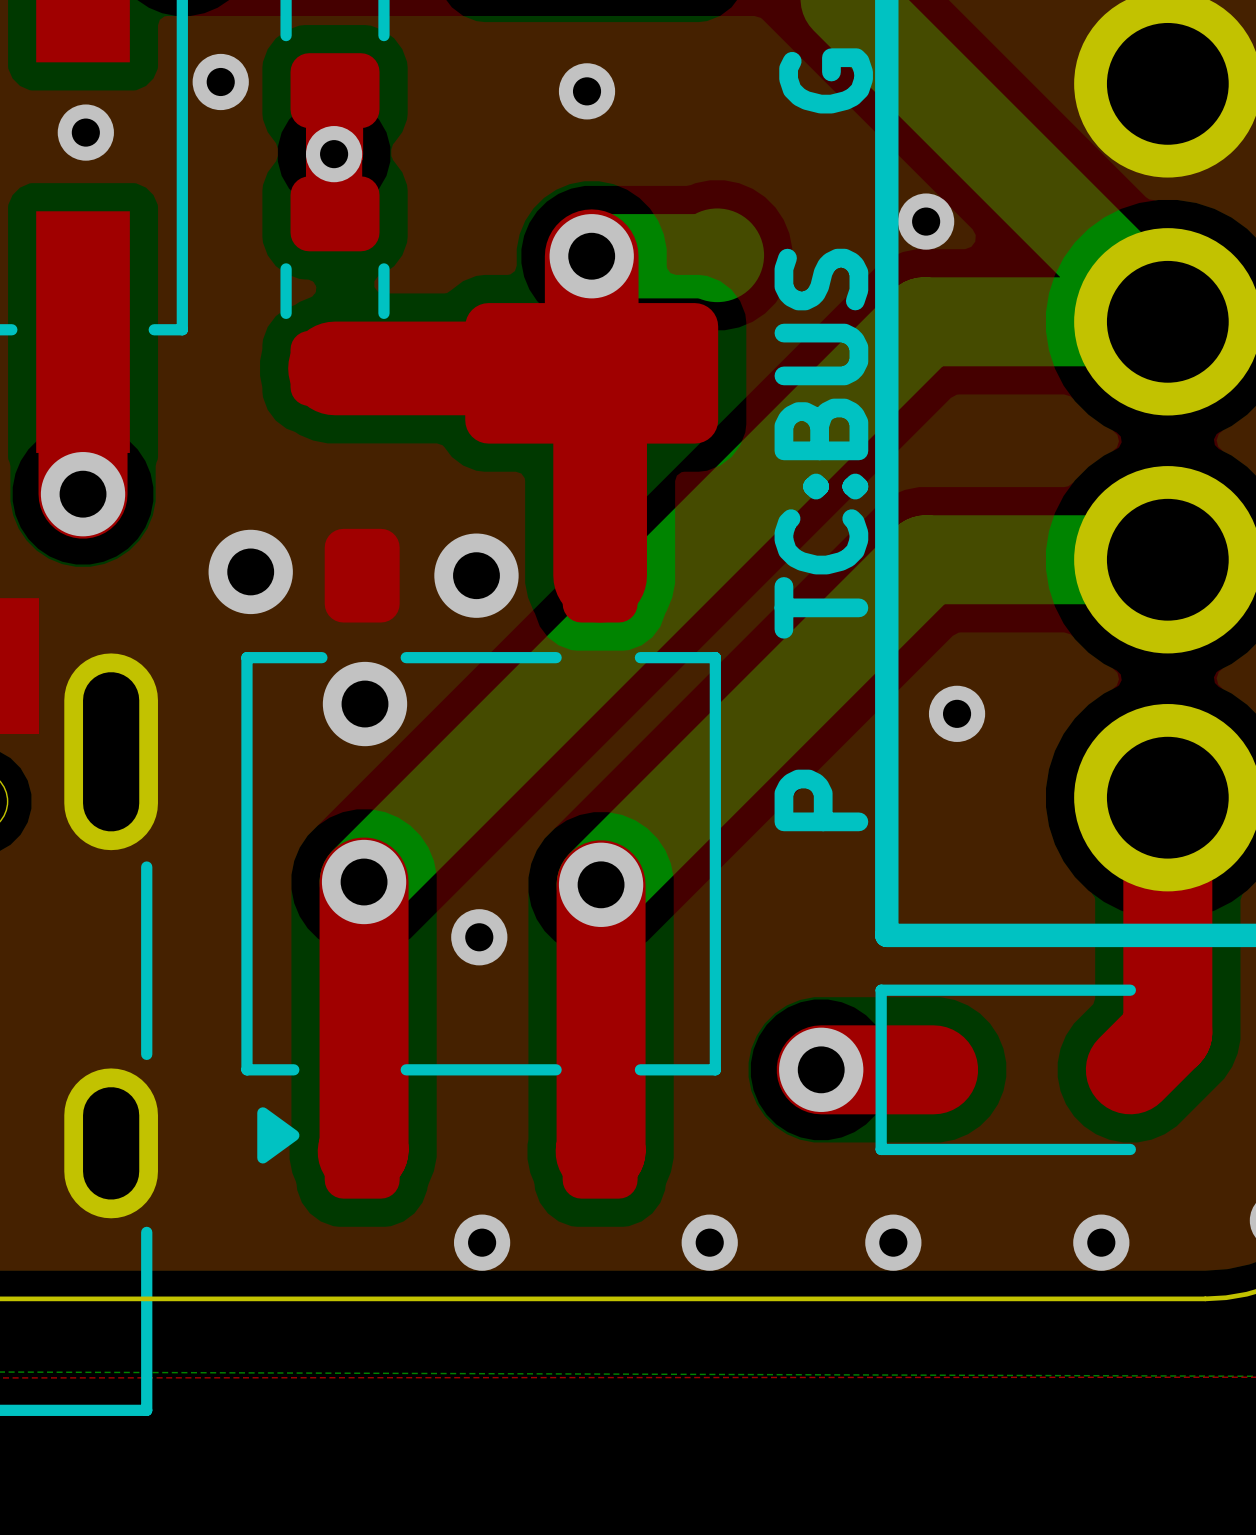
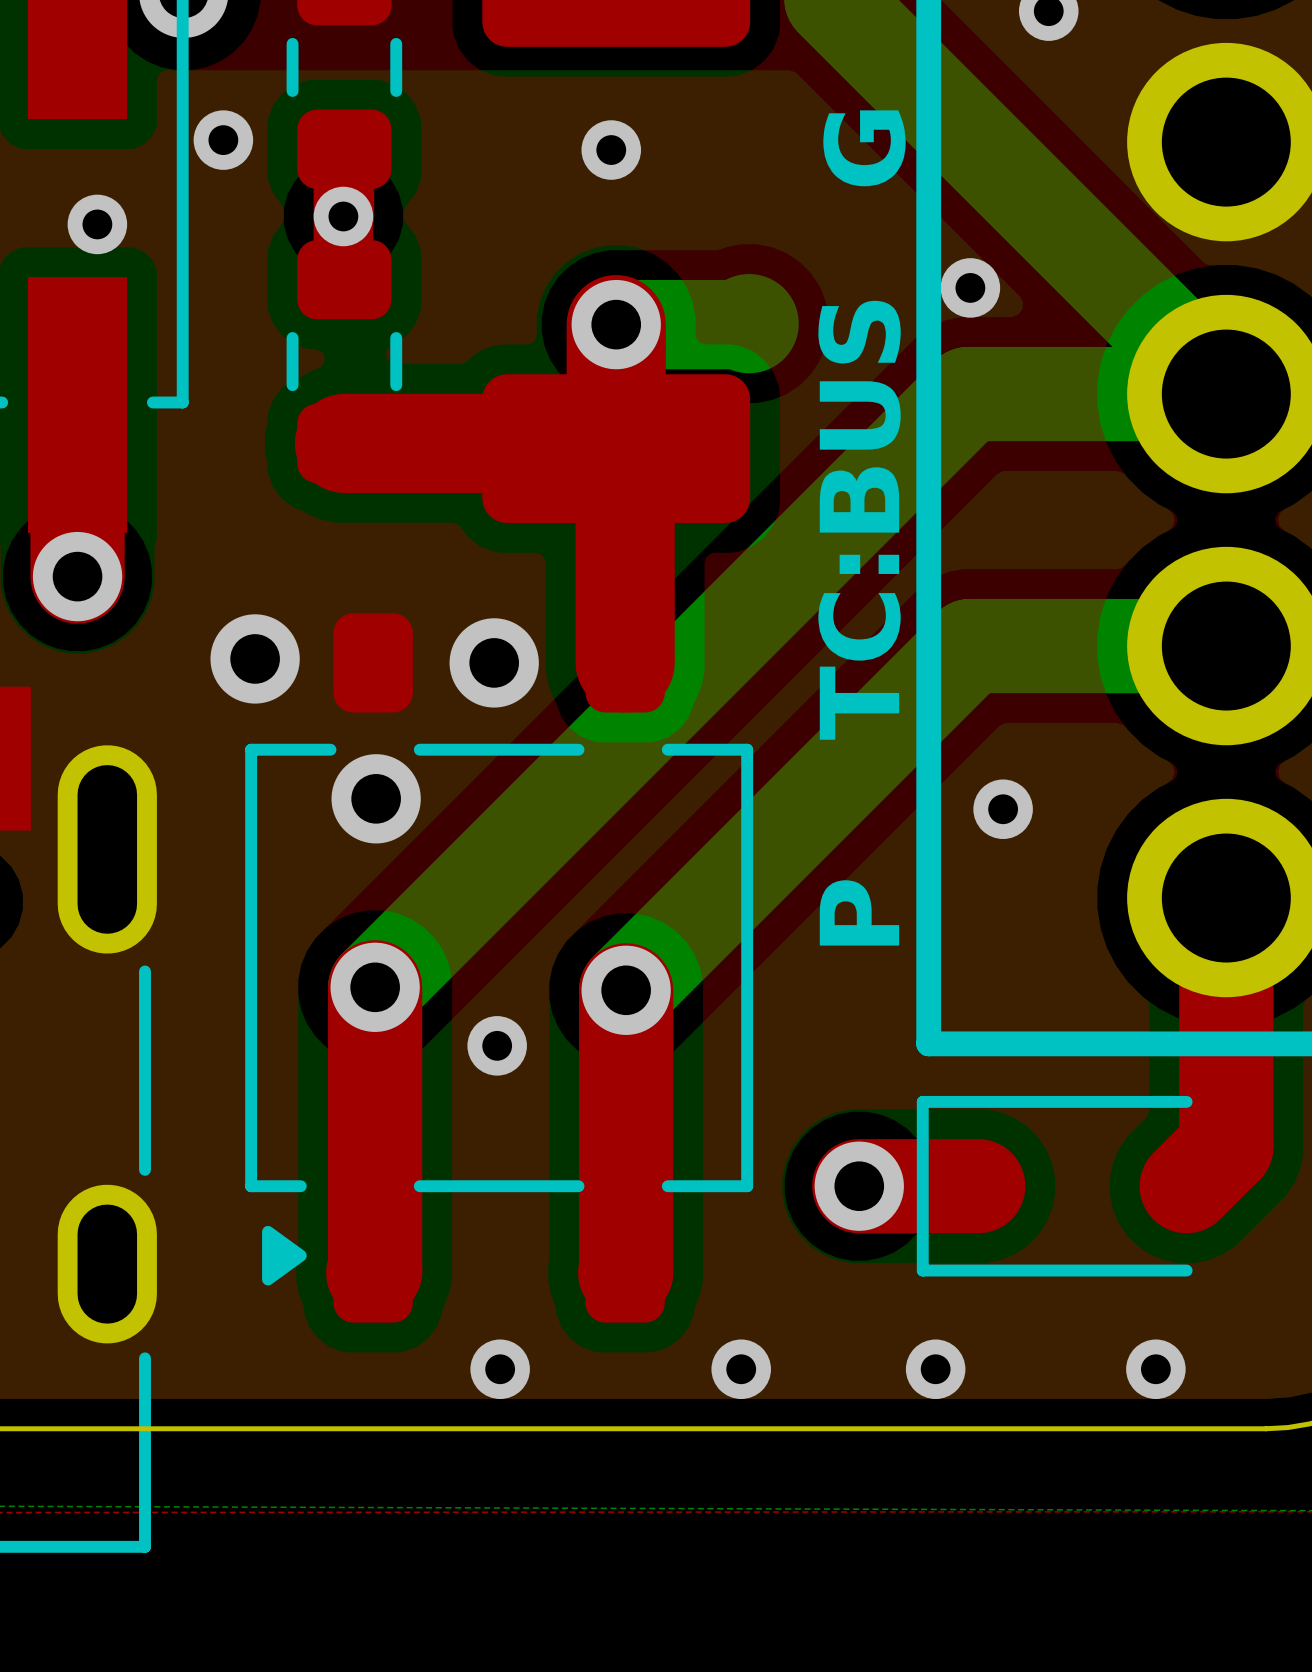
via position: (85, 132) -> (97, 224)

